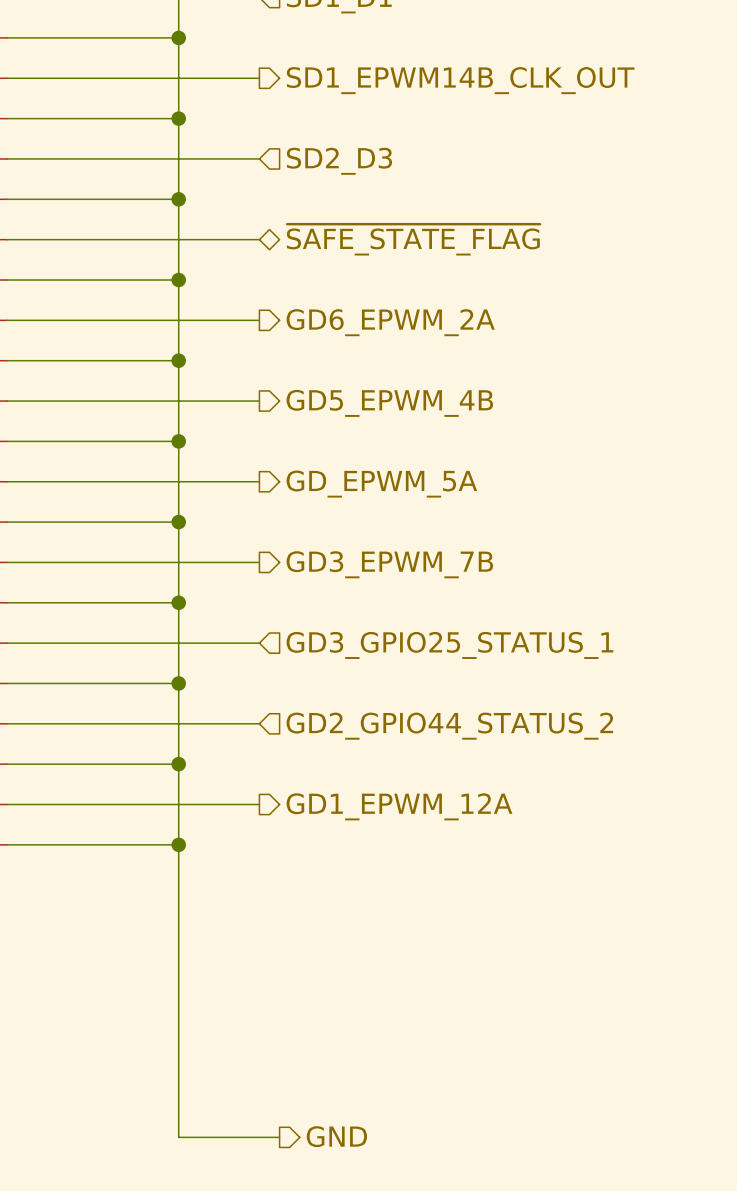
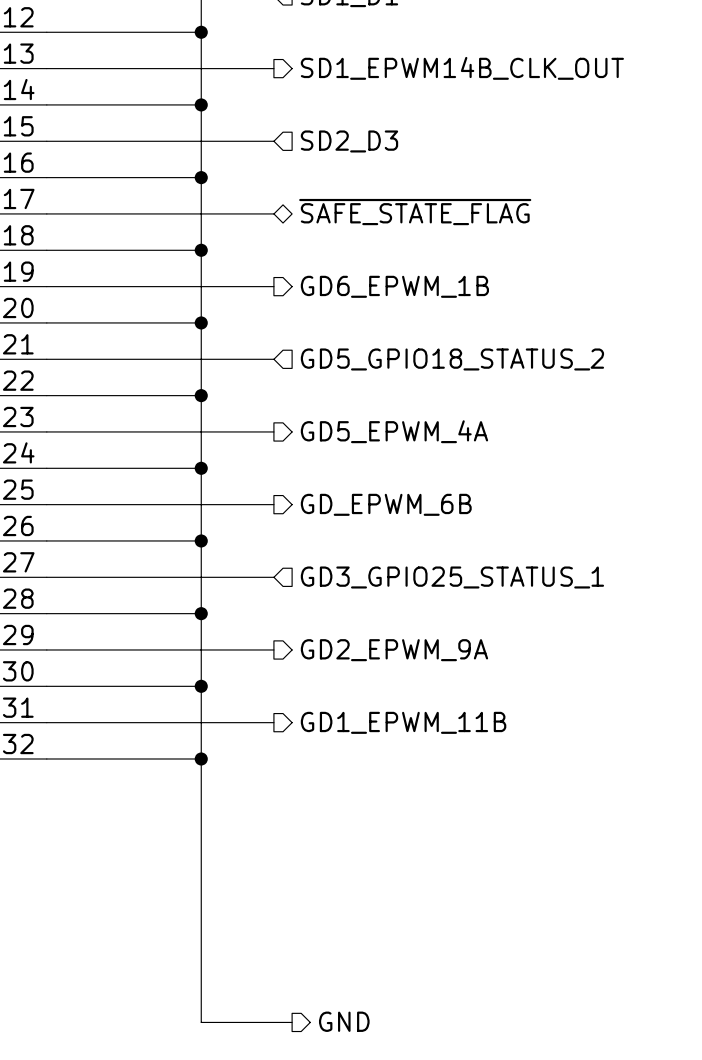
hierarchical label: GD6_EPWM_2A (390, 322) -> GD6_EPWM_1B (394, 286)
hierarchical label shape: output (389, 403) -> input (452, 359)
hierarchical label: GD5_EPWM_4B (389, 403) -> GD5_GPIO18_STATUS_2 (452, 359)
hierarchical label: GD_EPWM_5A (381, 484) -> GD5_EPWM_4A (394, 431)
hierarchical label: GD3_EPWM_7B (389, 564) -> GD_EPWM_6B (386, 504)
hierarchical label shape: input (449, 726) -> output (394, 650)
hierarchical label: GD2_GPIO44_STATUS_2 (449, 726) -> GD2_EPWM_9A (394, 650)
hierarchical label: GD1_EPWM_12A (399, 806) -> GD1_EPWM_11B (403, 722)

